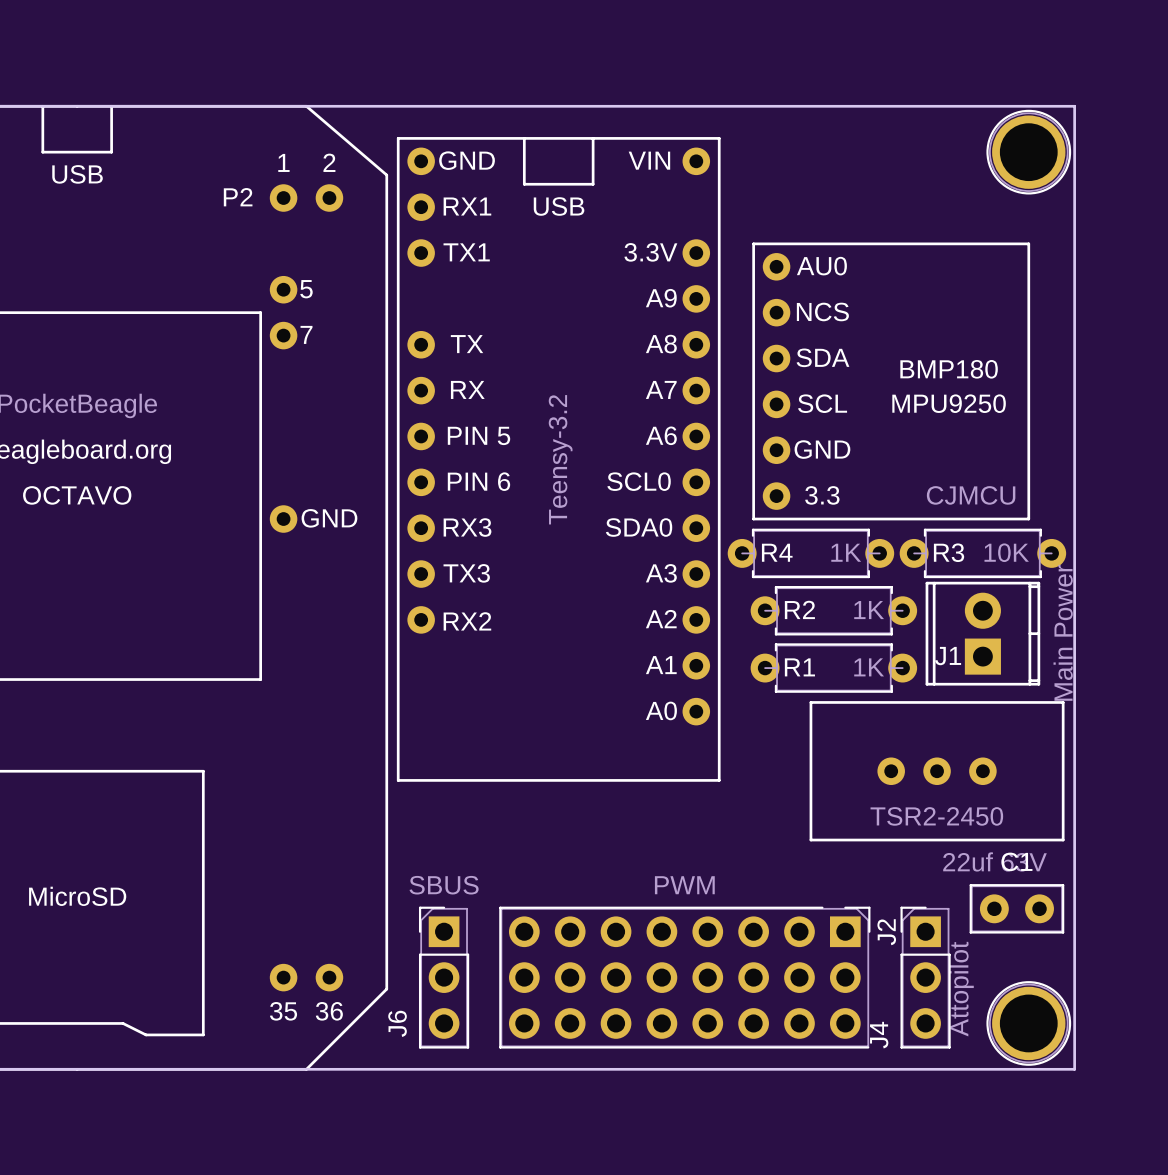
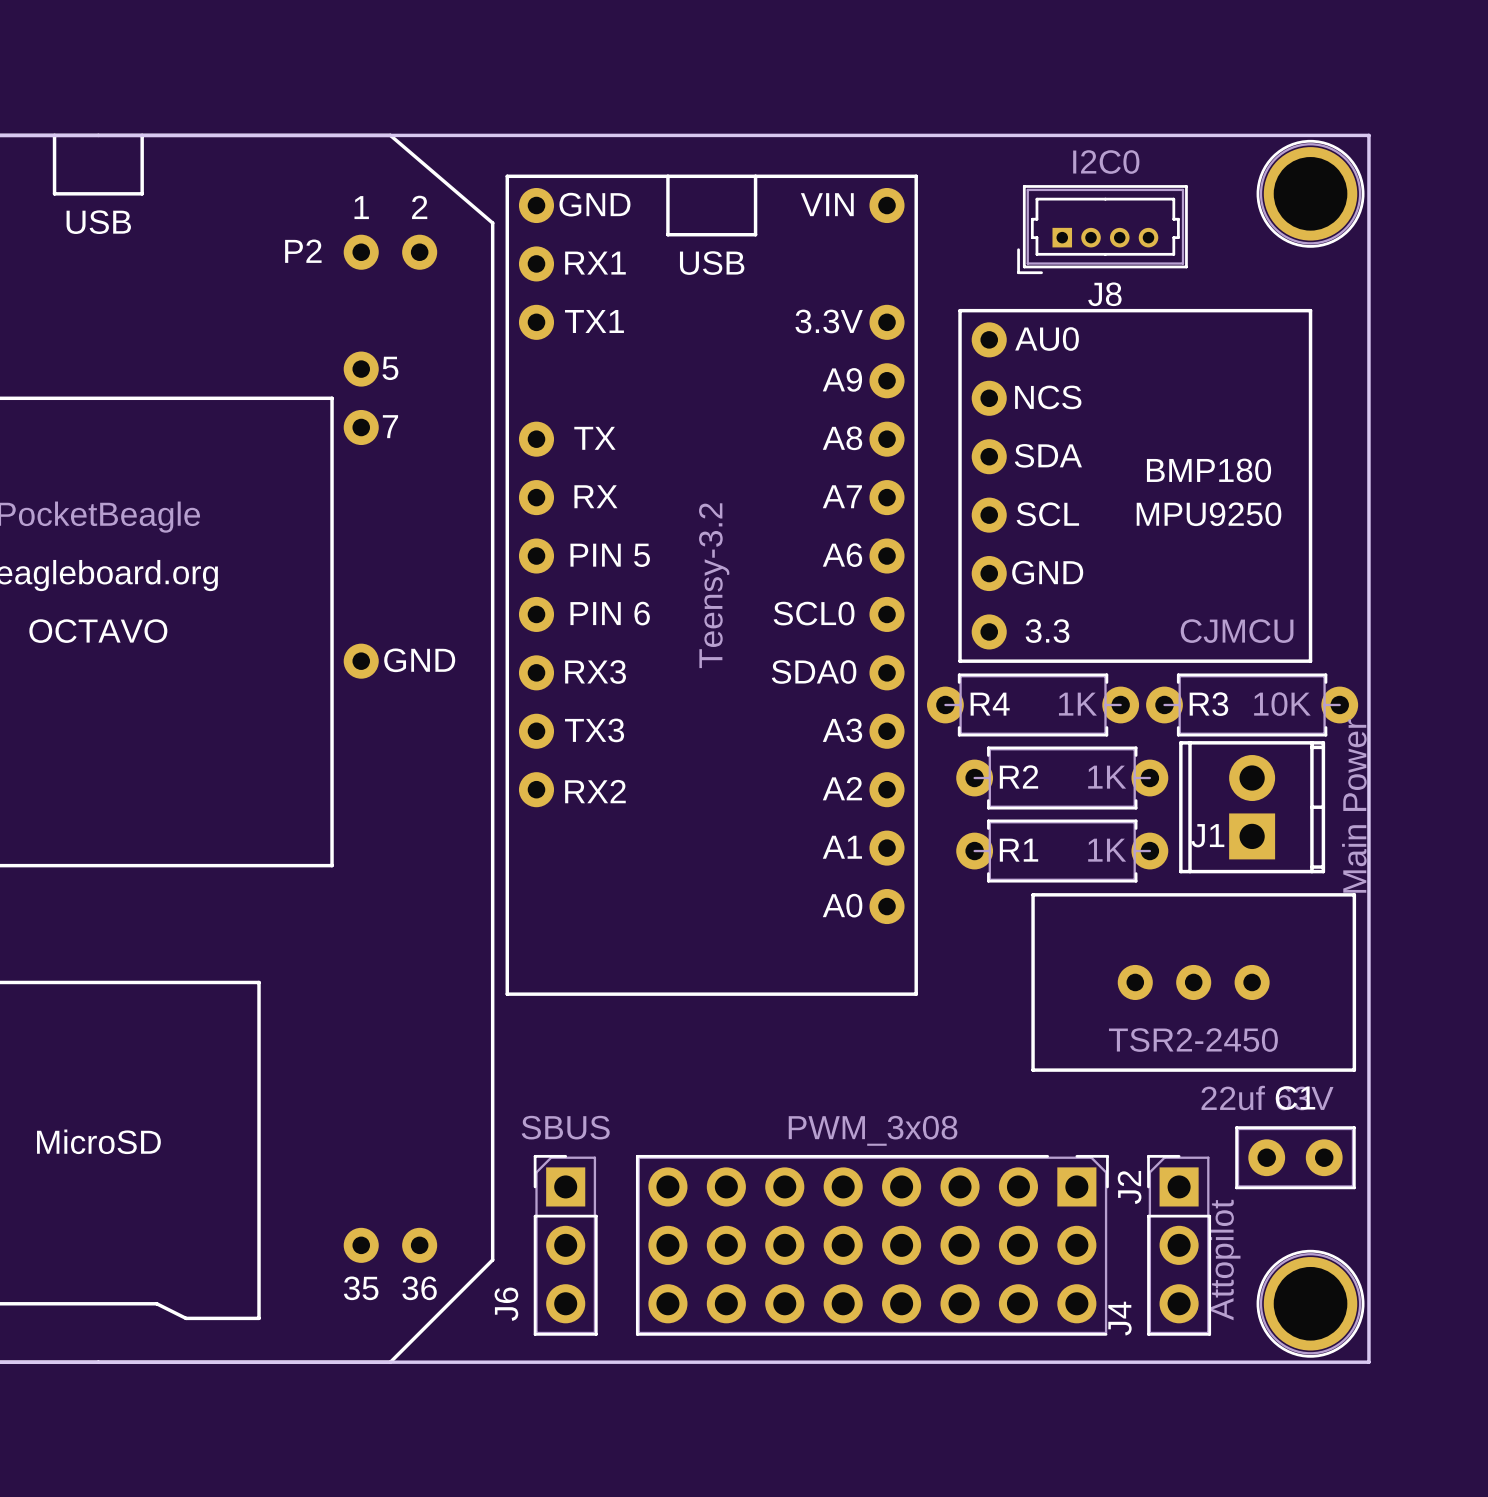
J8: none -> I2C0 (1102, 229)
J2 value: PWM (684, 885) -> PWM_3x08 (873, 1130)

